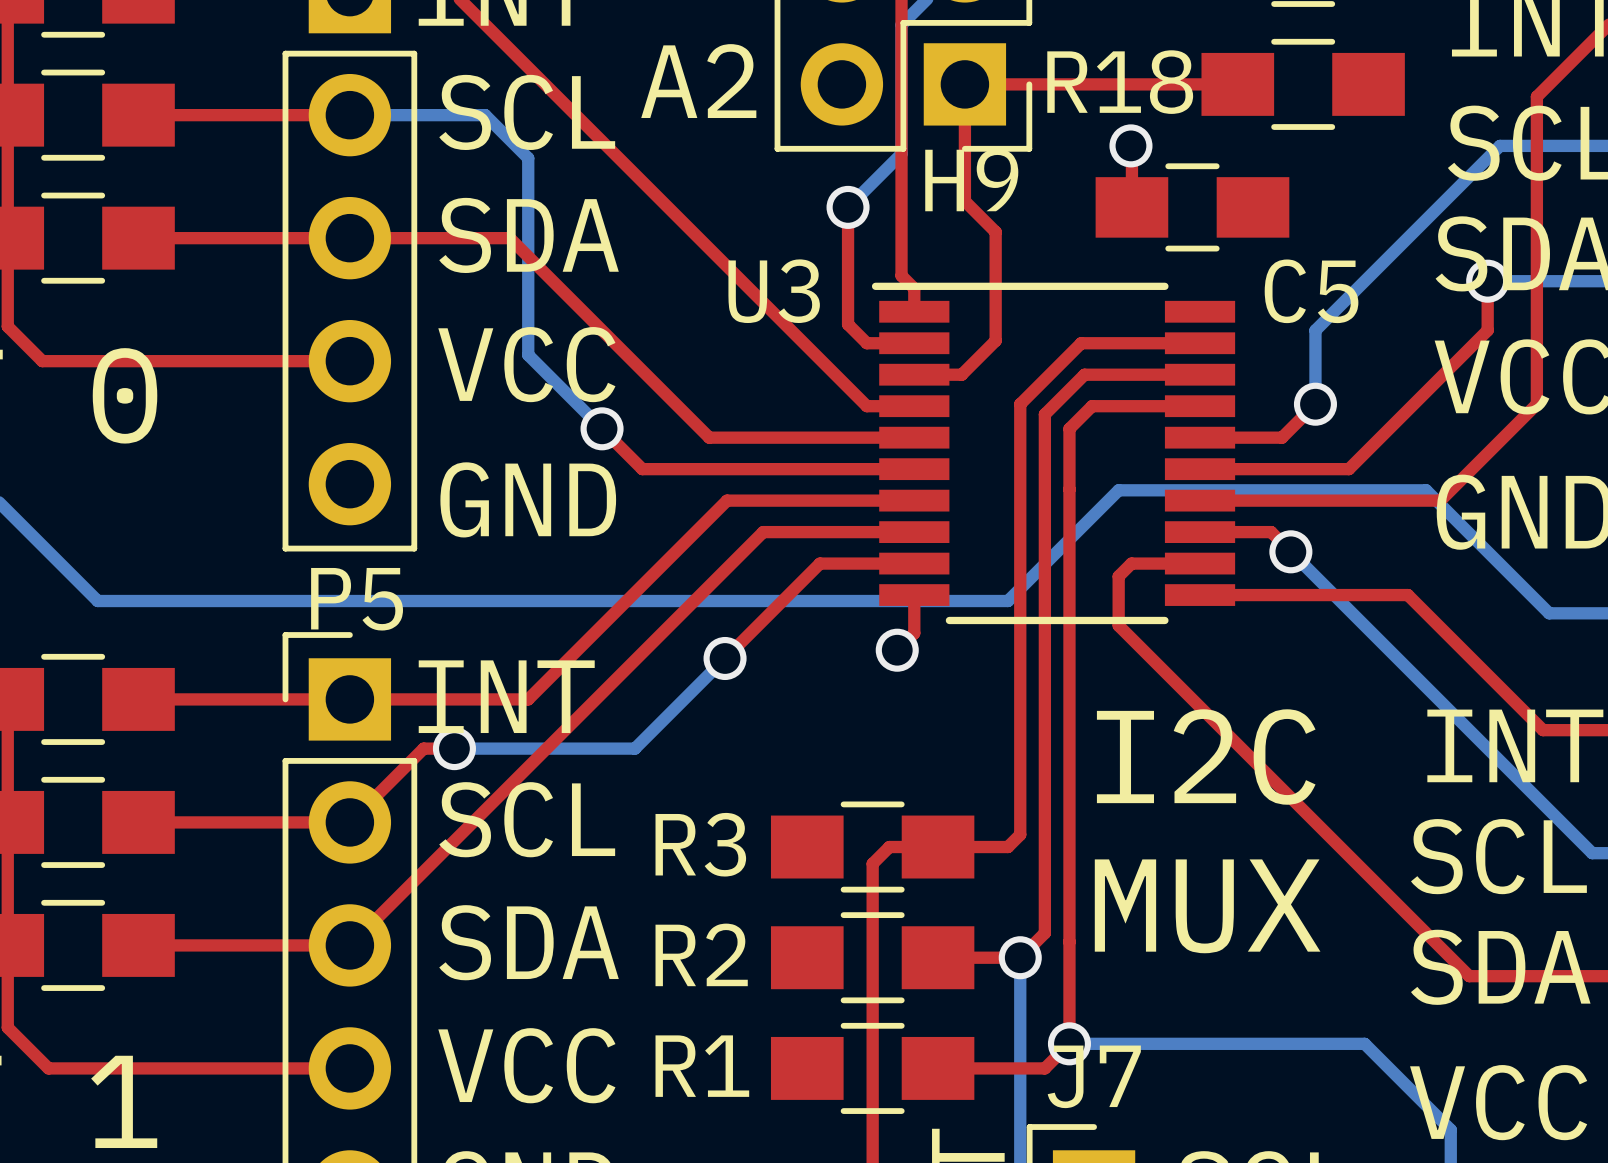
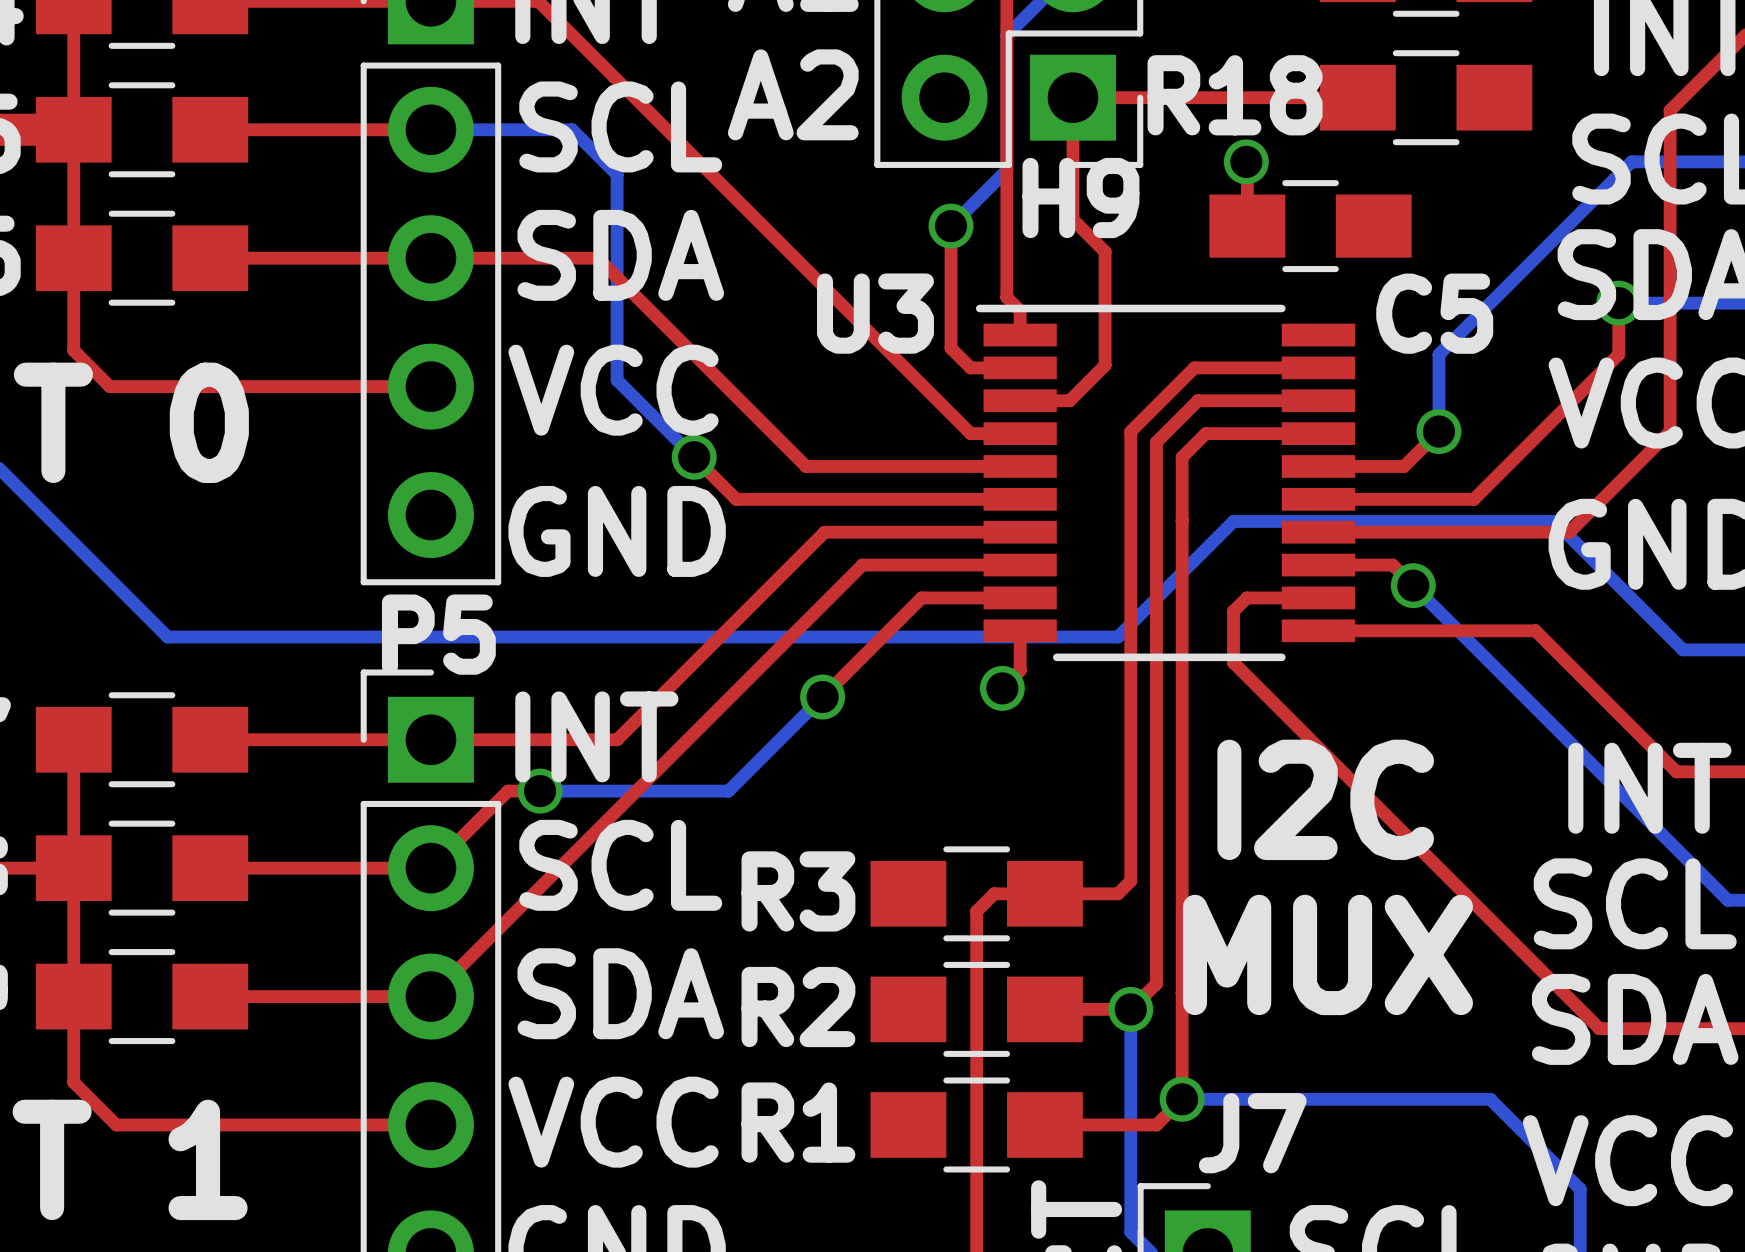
J7 name position: J7 (1094, 1076) -> J7 (1252, 1133)

